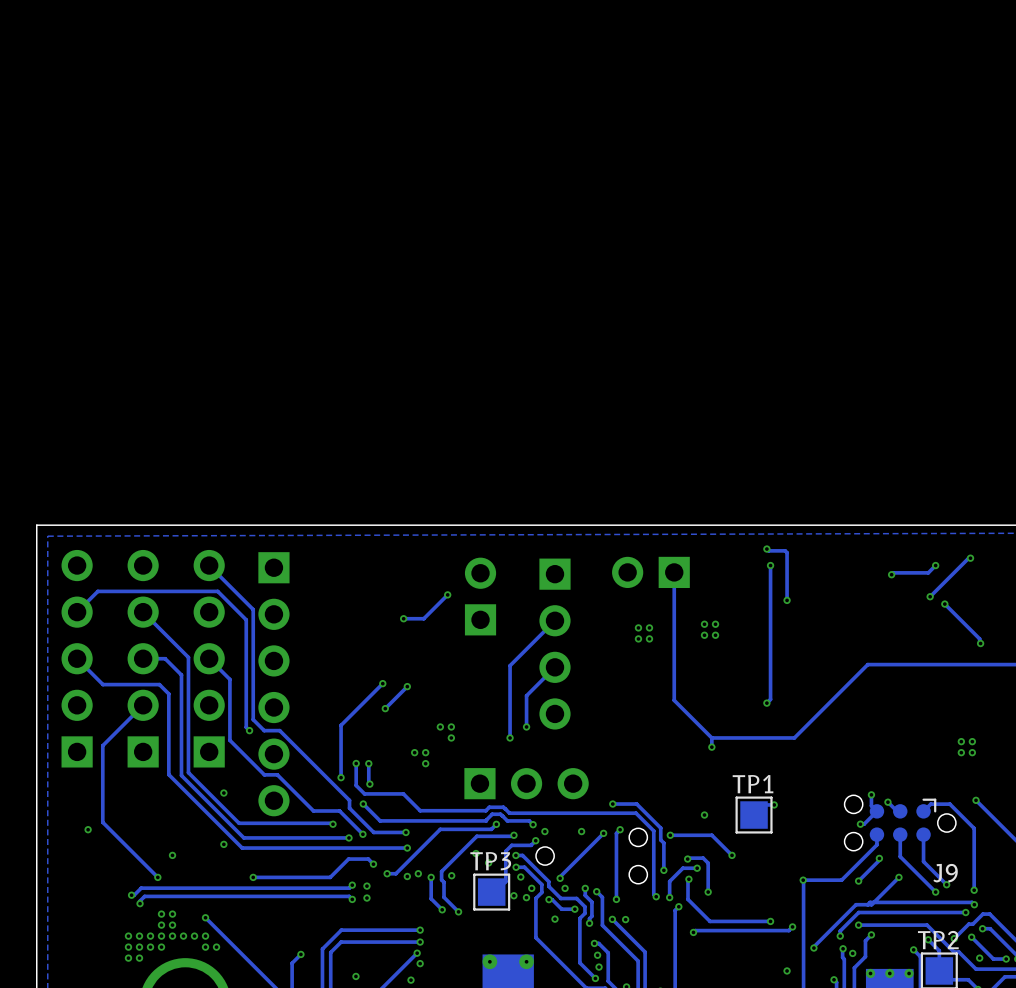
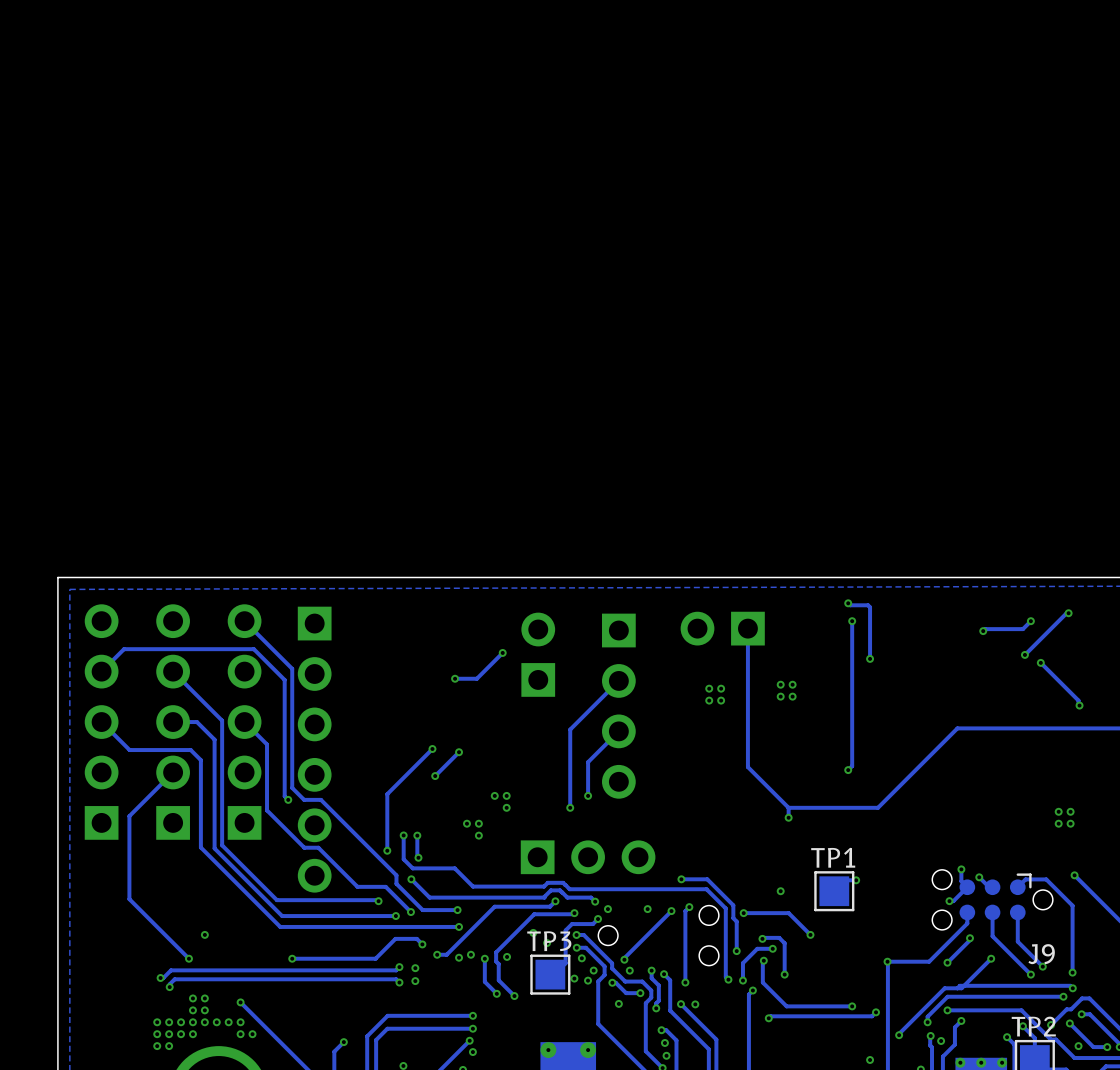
via: (223, 793) -> none
via: (88, 829) -> none
via: (223, 844) -> none

